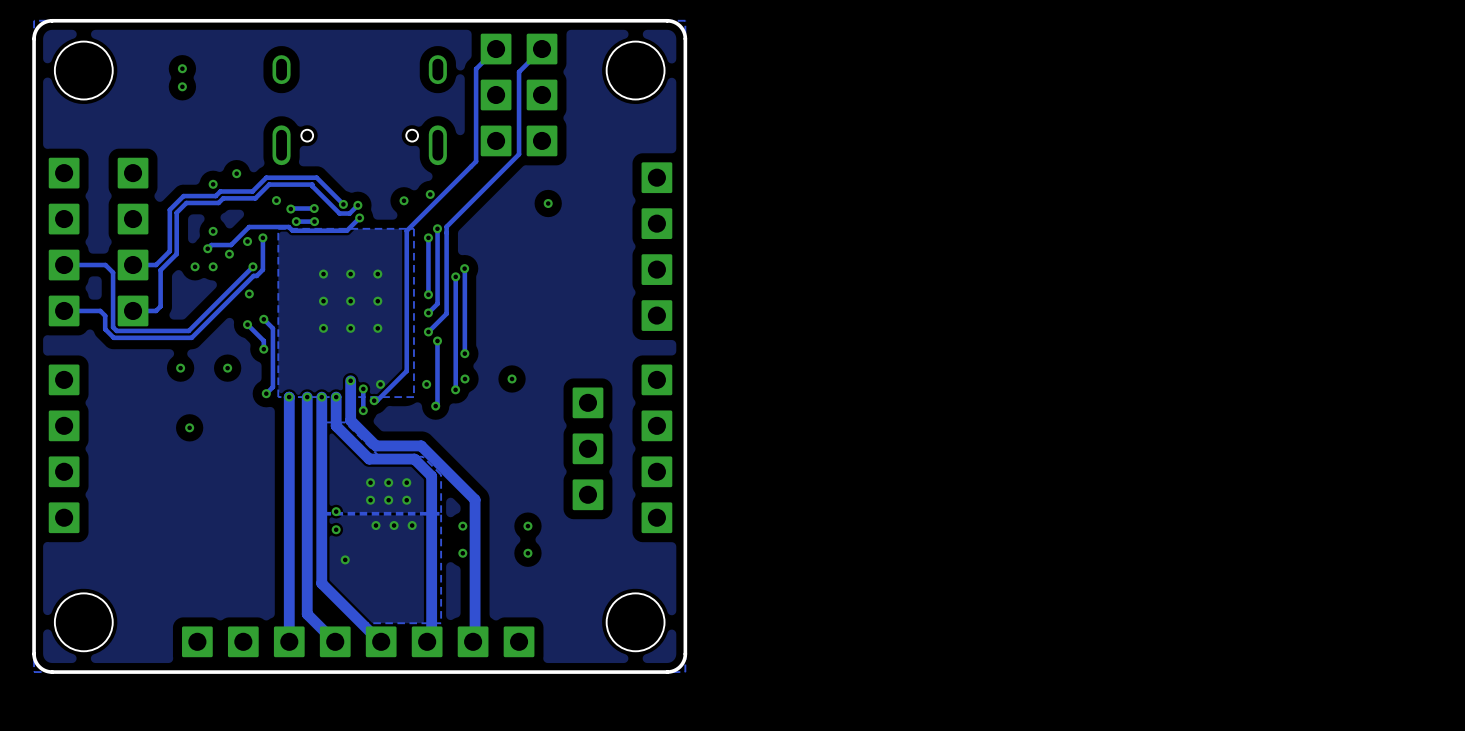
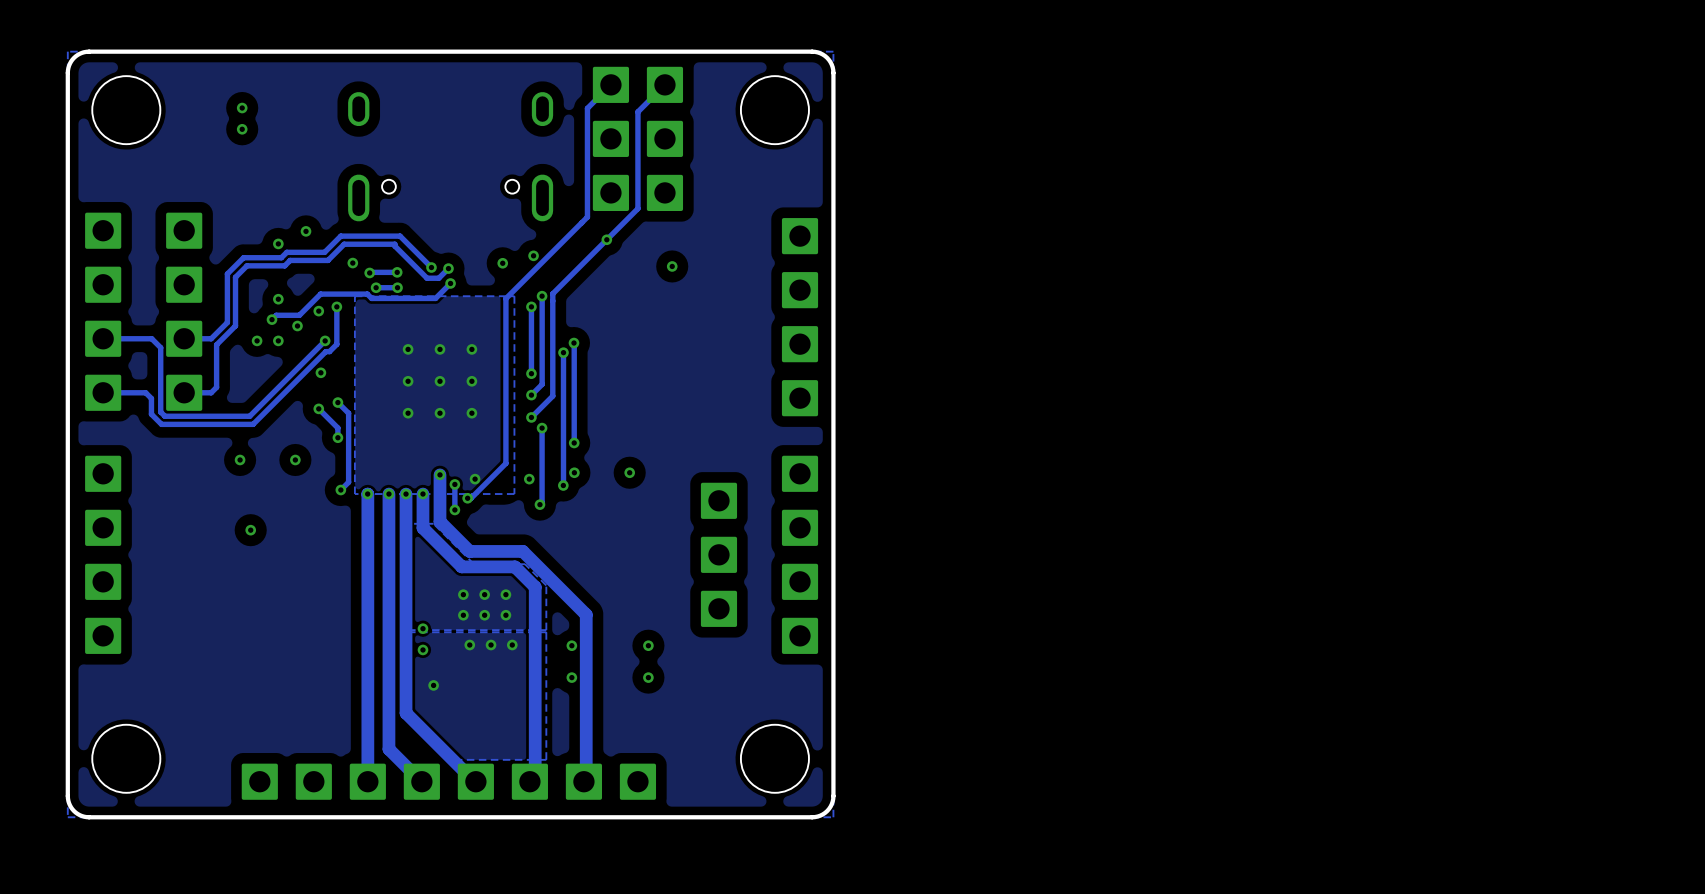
via: none -> (606, 239)

